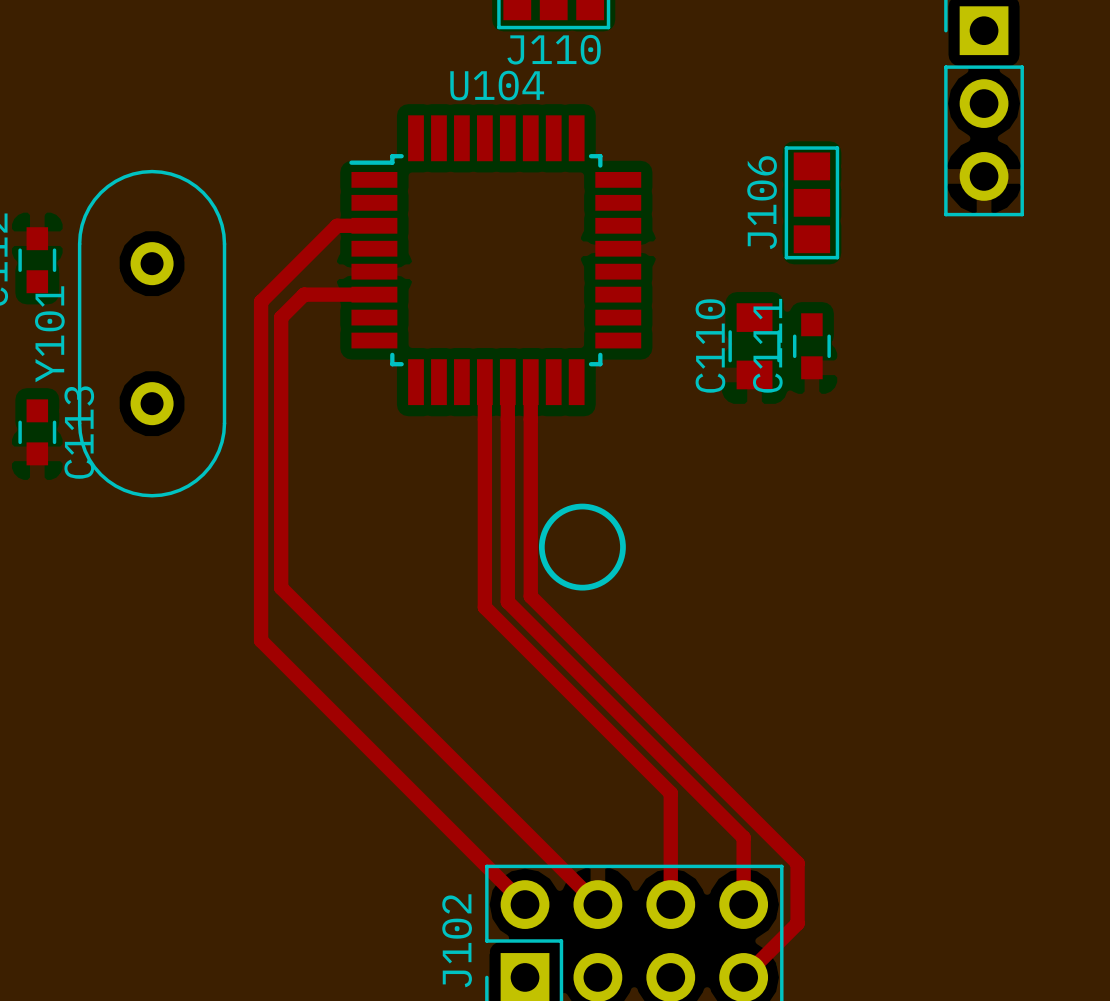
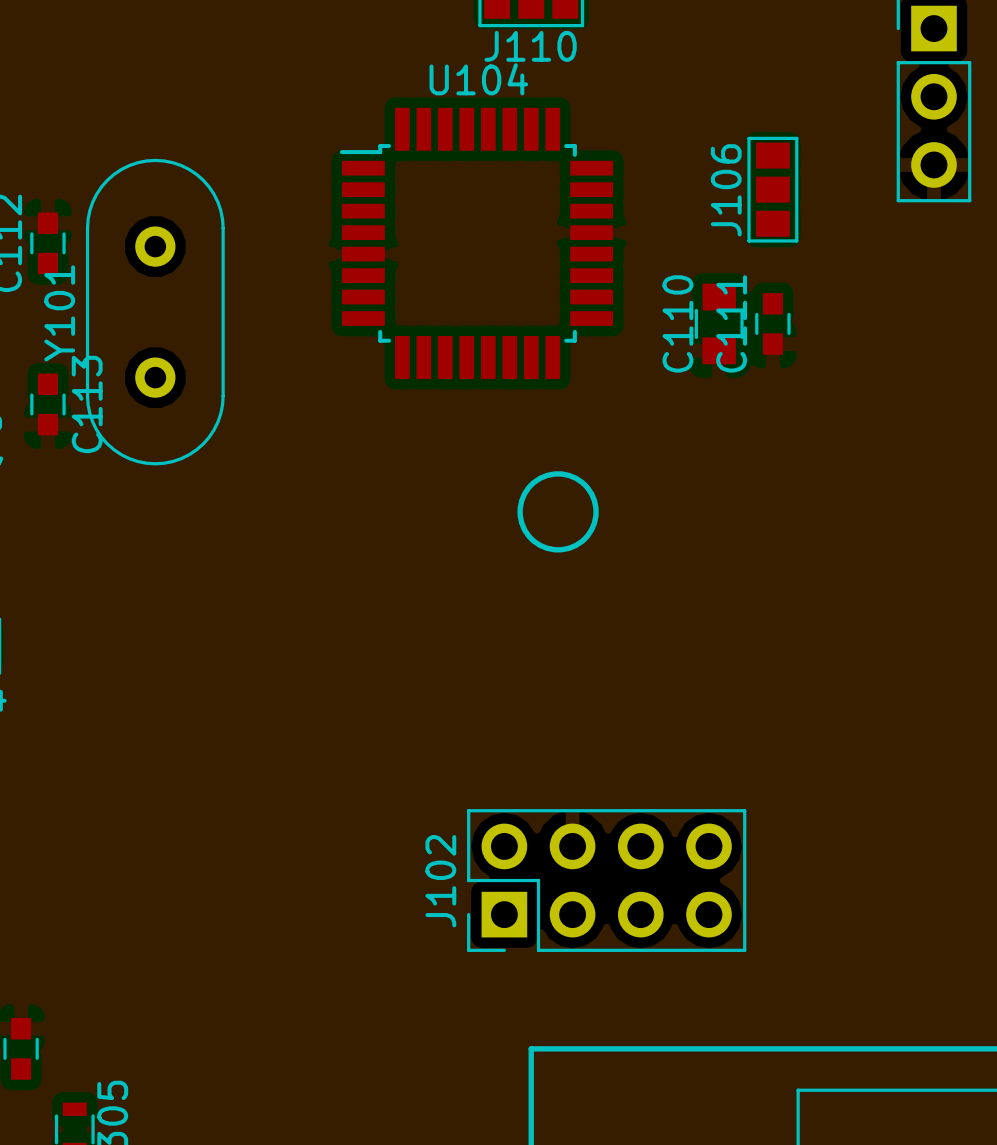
top track: (374, 225) (337, 225) (261, 301) (261, 640) (525, 904) -> none
top track: (374, 294) (304, 294) (281, 317) (281, 587) (597, 904) -> none
top track: (484, 382) (484, 607) (670, 793) (670, 904) -> none
top track: (507, 382) (507, 601) (743, 837) (743, 904) -> none
top track: (530, 382) (530, 596) (797, 863) (797, 923) (743, 977) -> none

